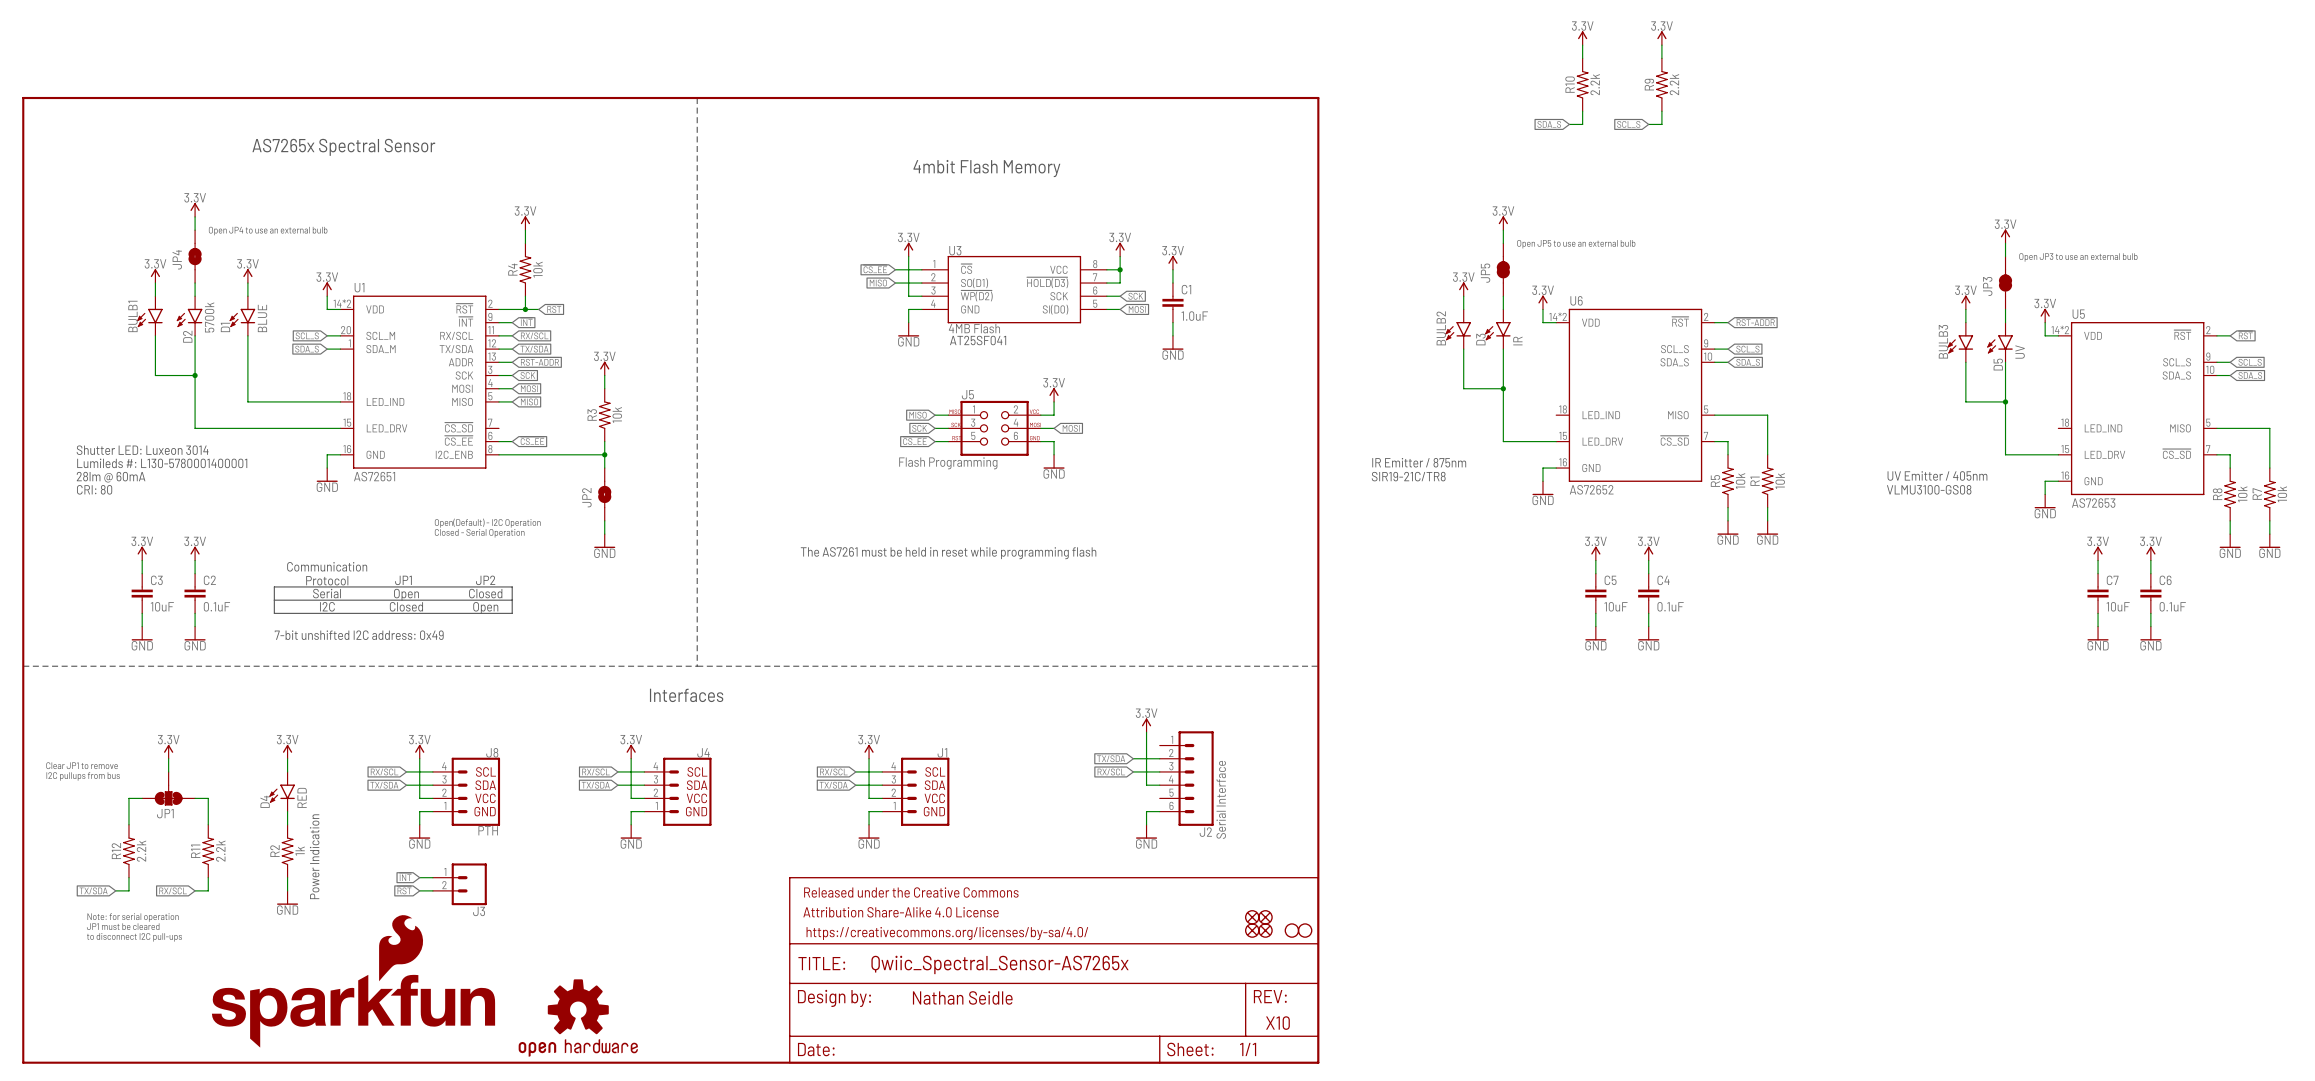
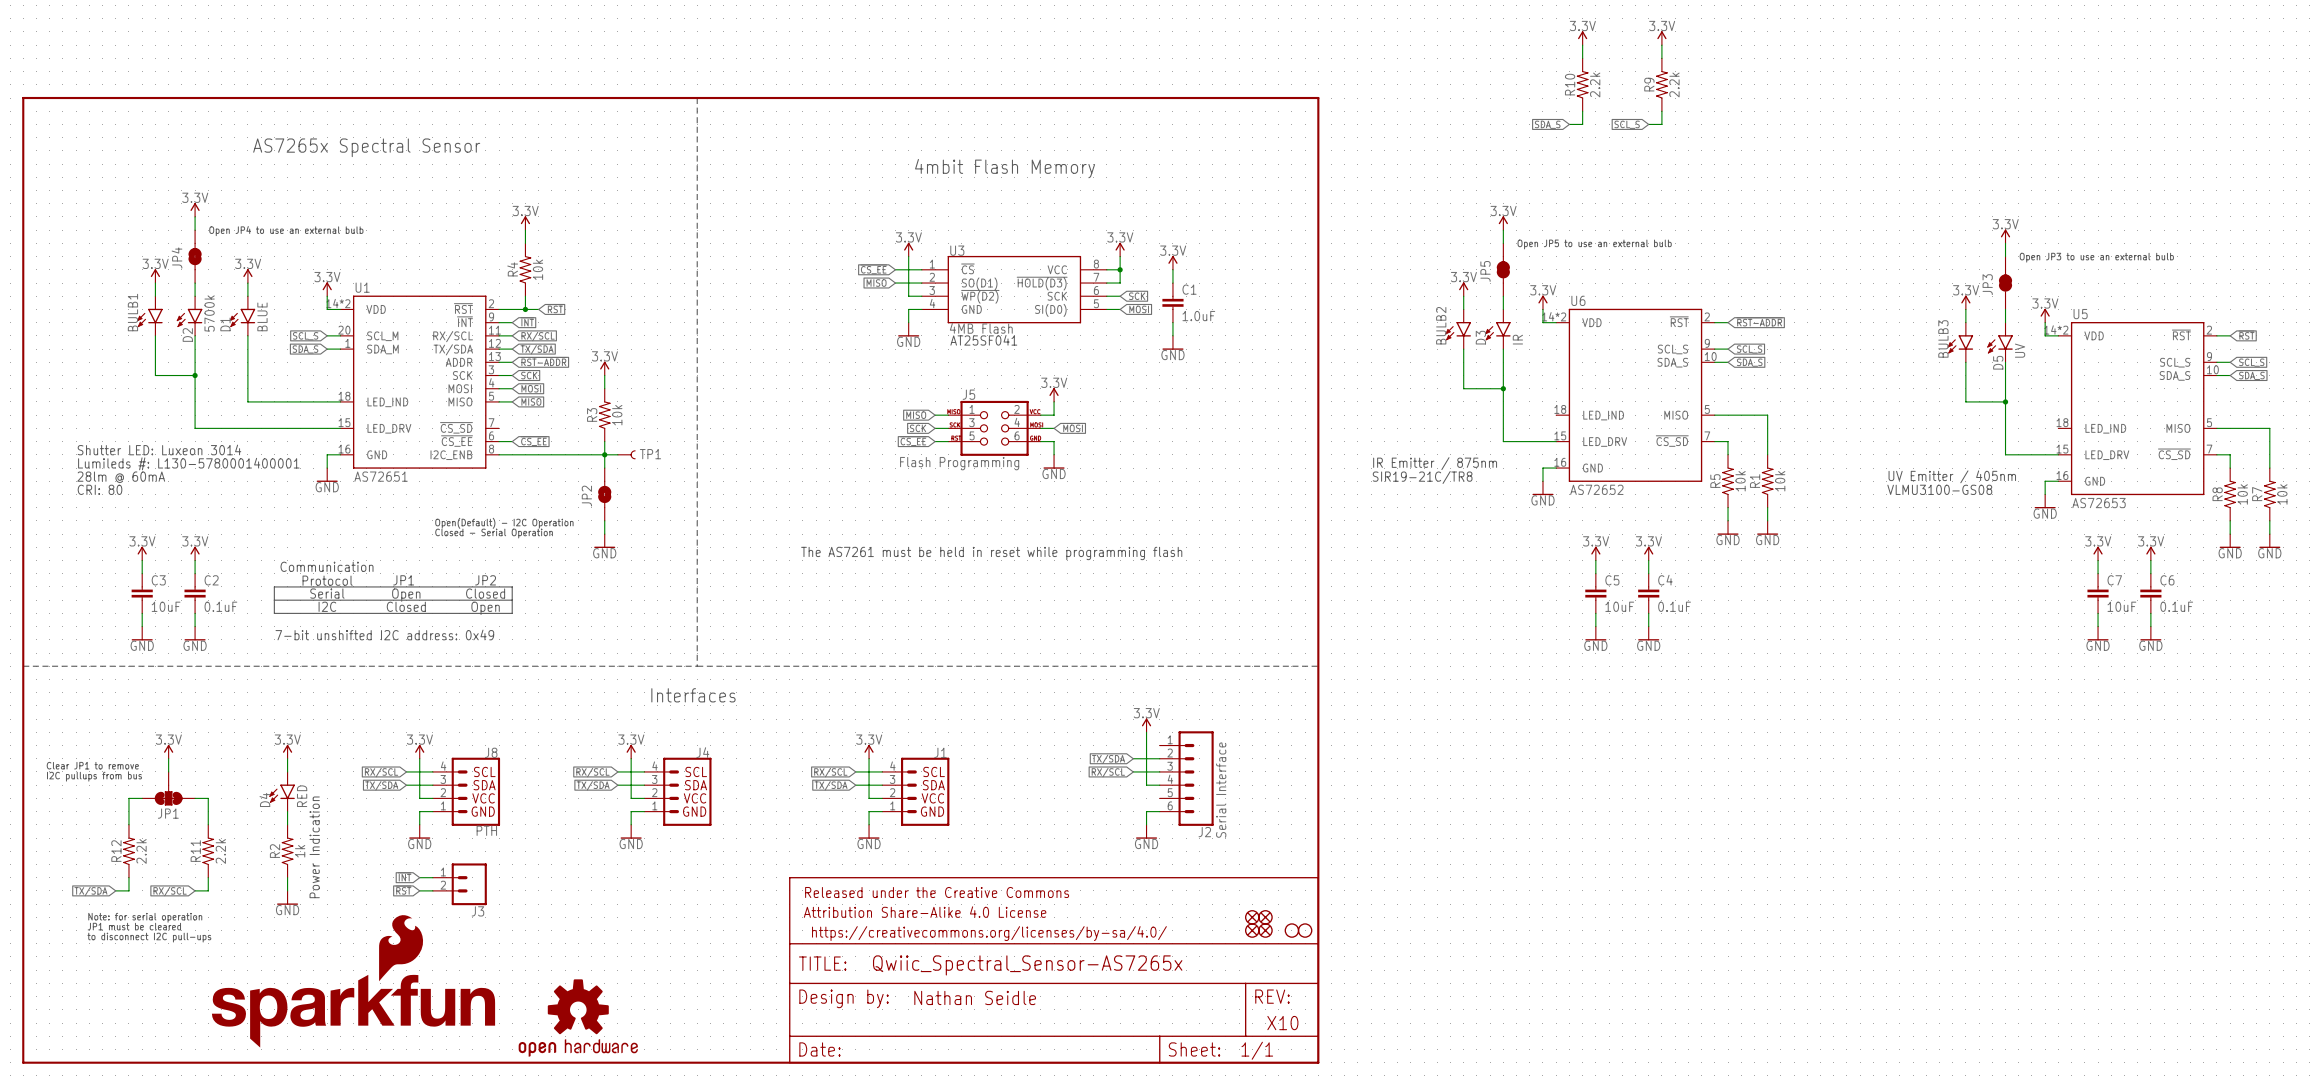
wire: none -> (604, 454) (617, 454)
TP1: none -> (626, 454)

